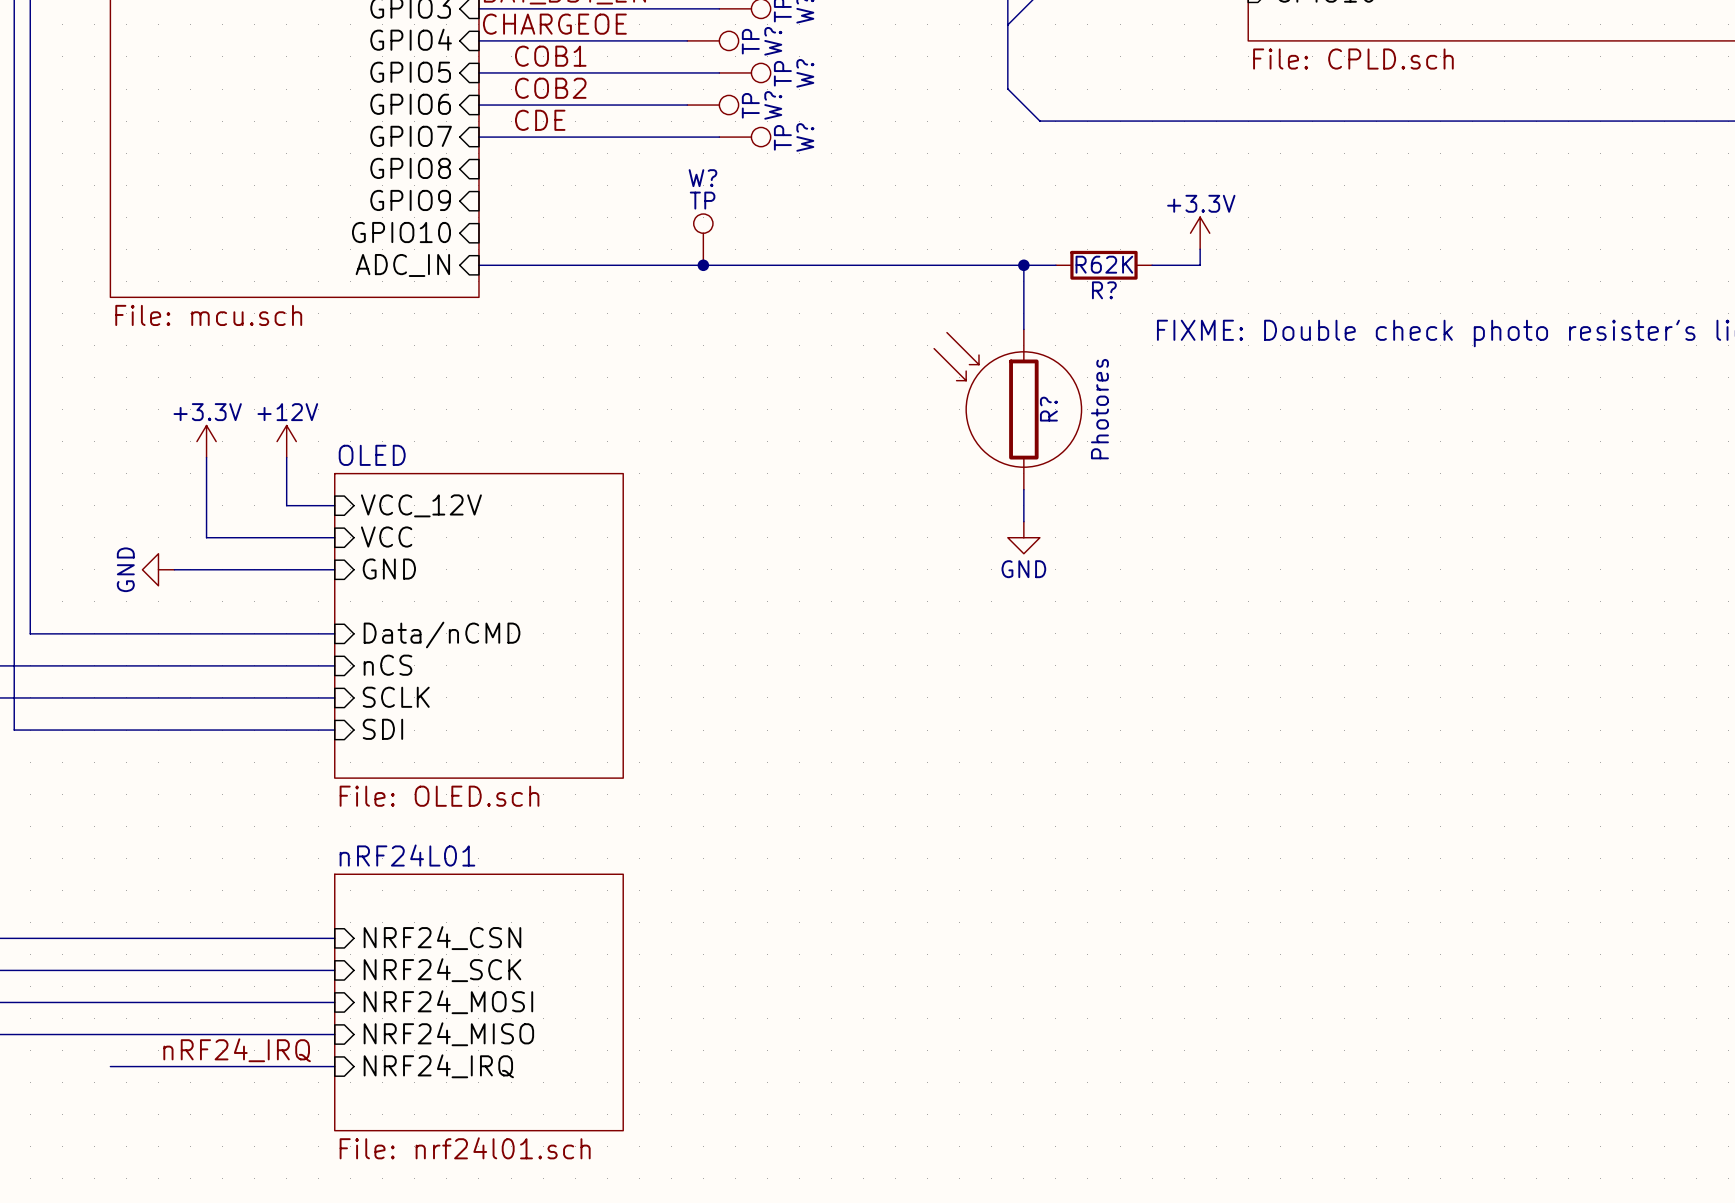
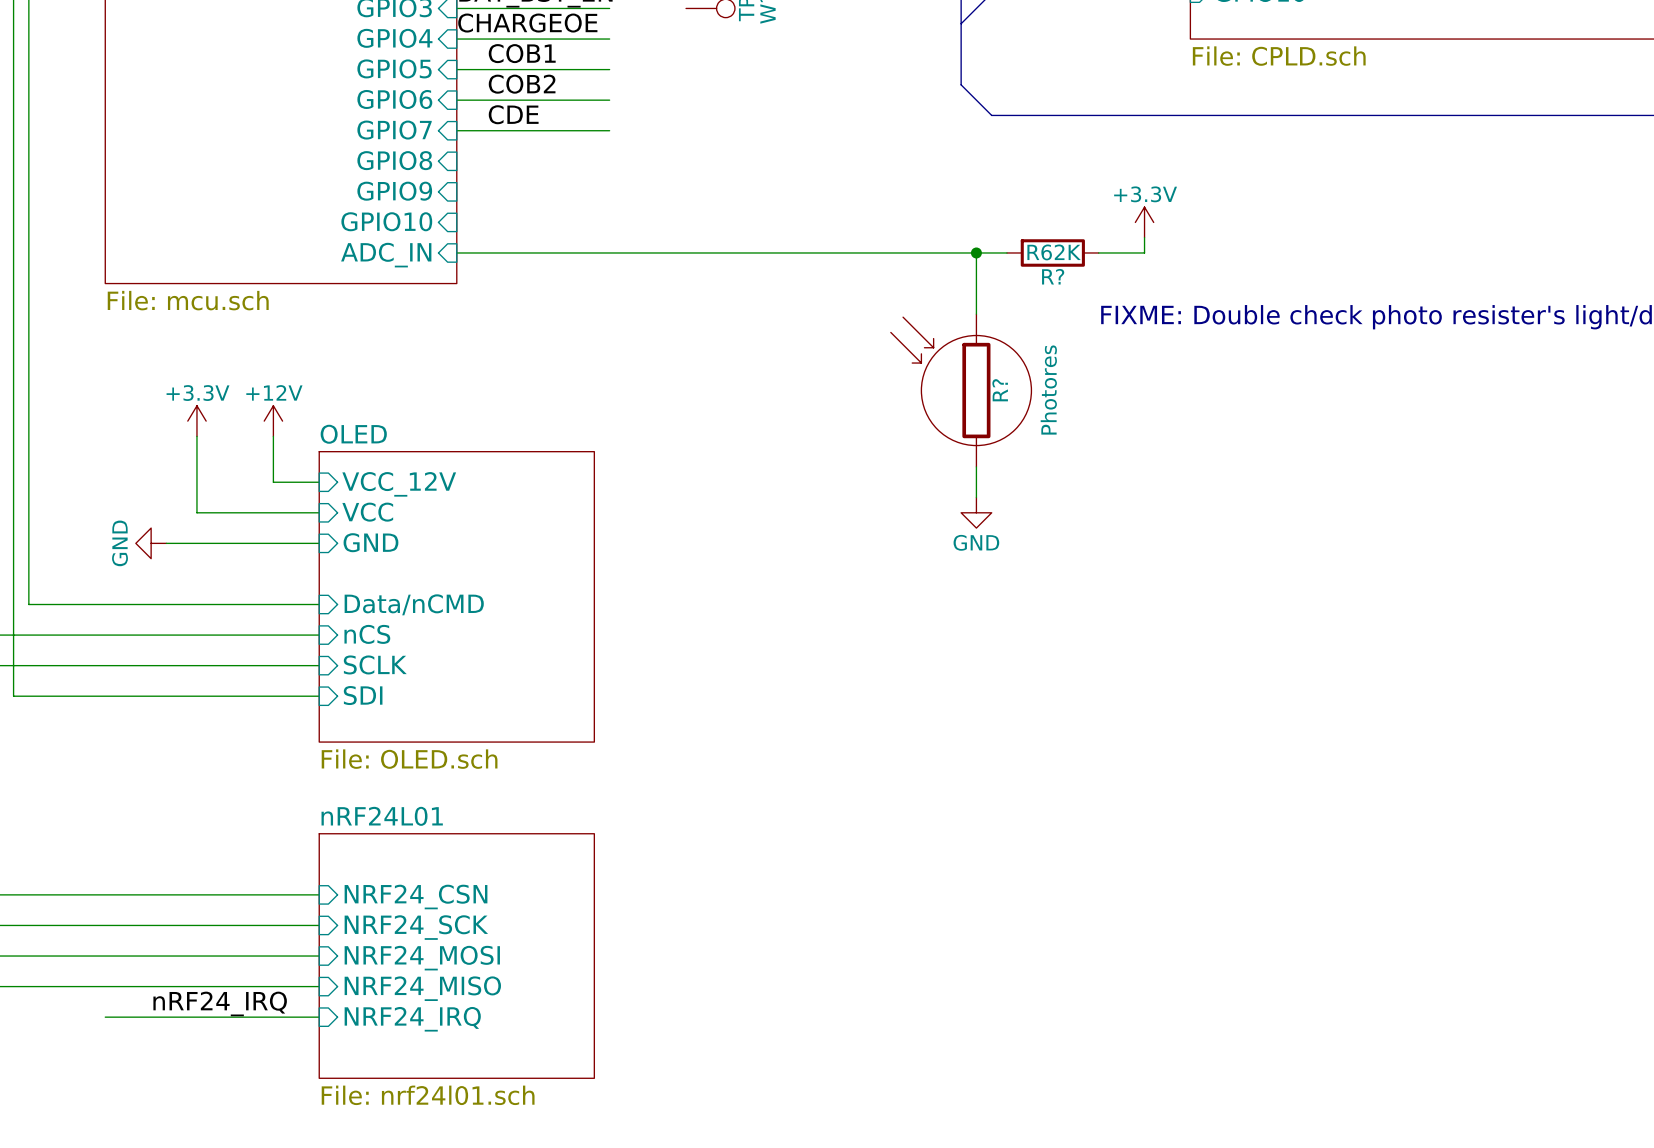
wire: (639, 8) (719, 8) -> none
wire: (639, 40) (687, 40) -> none
W?: TP (712, 40) -> none
wire: (639, 72) (719, 72) -> none
W?: TP (745, 72) -> none
wire: (639, 105) (687, 105) -> none
W?: TP (712, 105) -> none
wire: (639, 137) (719, 137) -> none
W?: TP (745, 137) -> none
W?: TP (703, 239) -> none
junction: (703, 265) -> none

